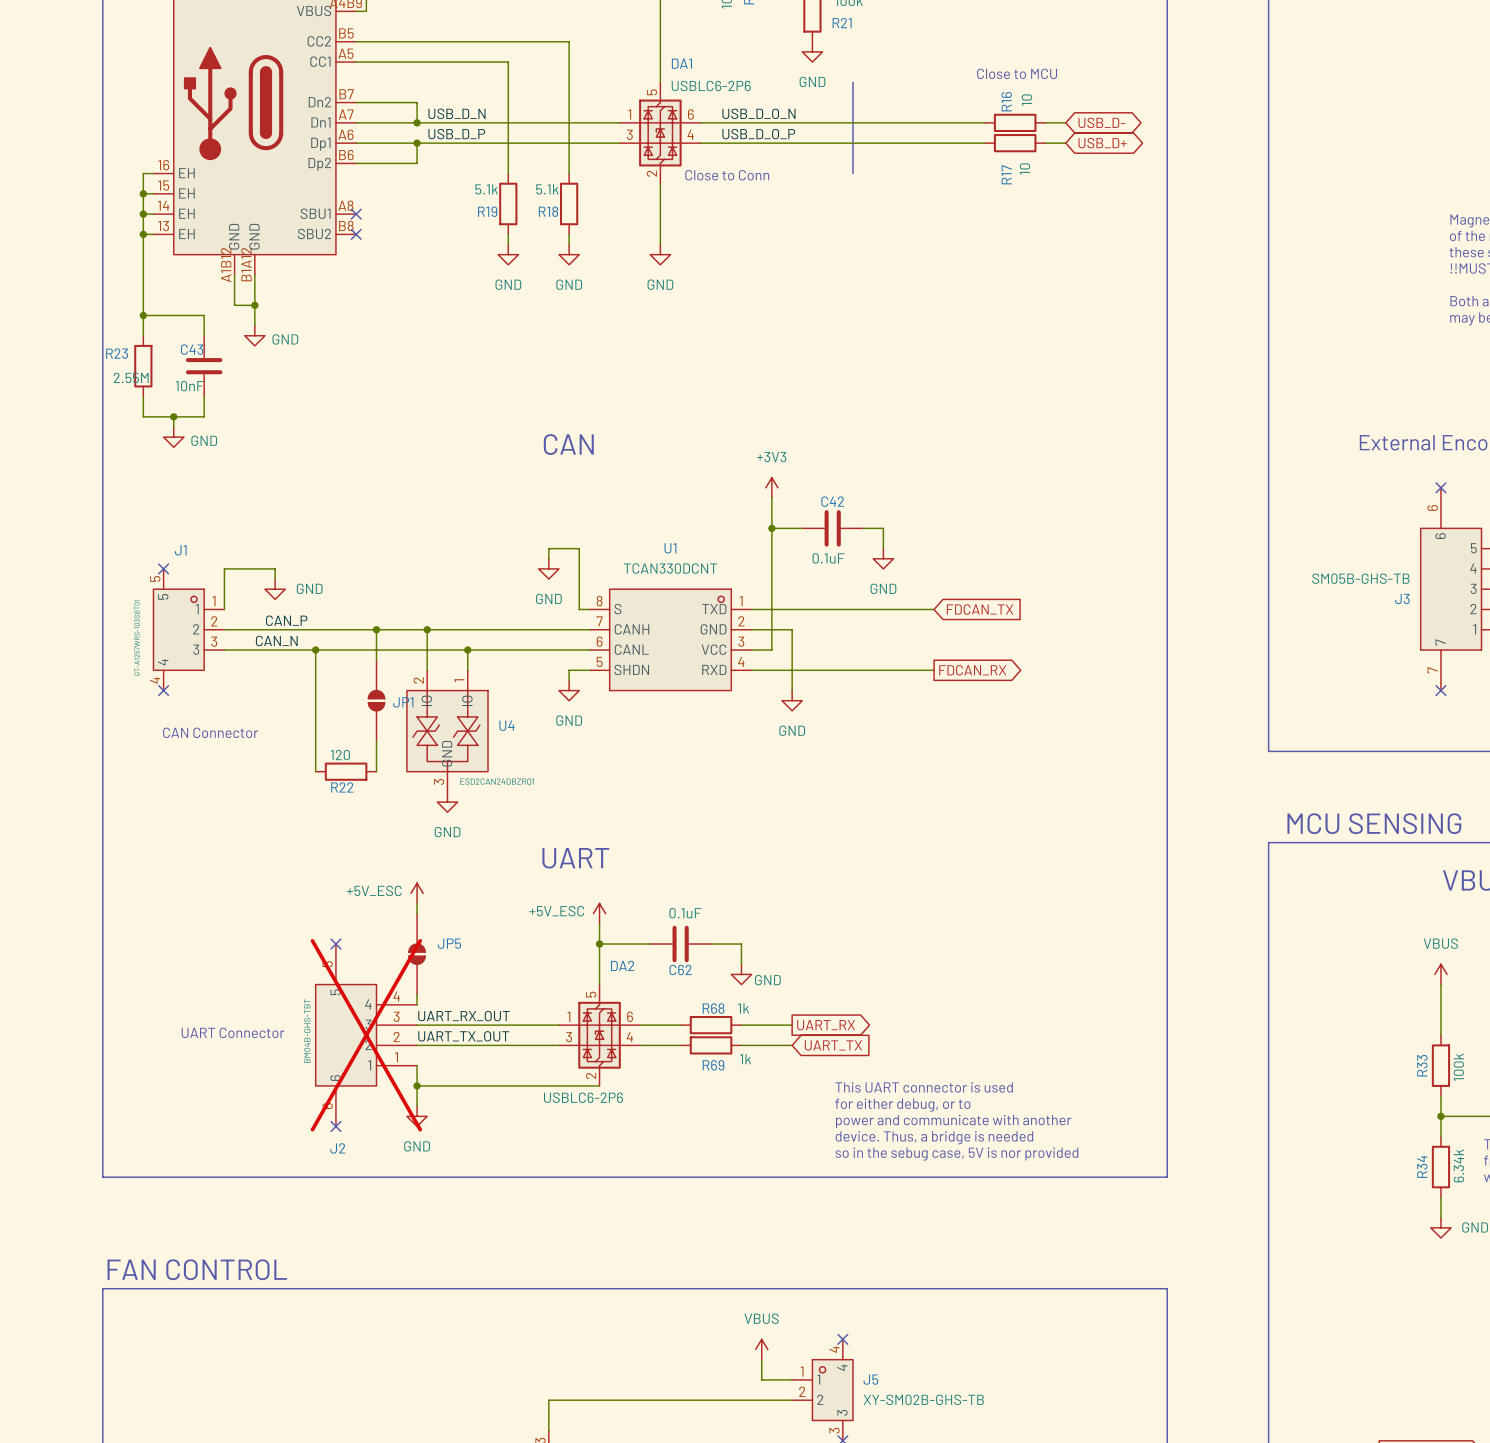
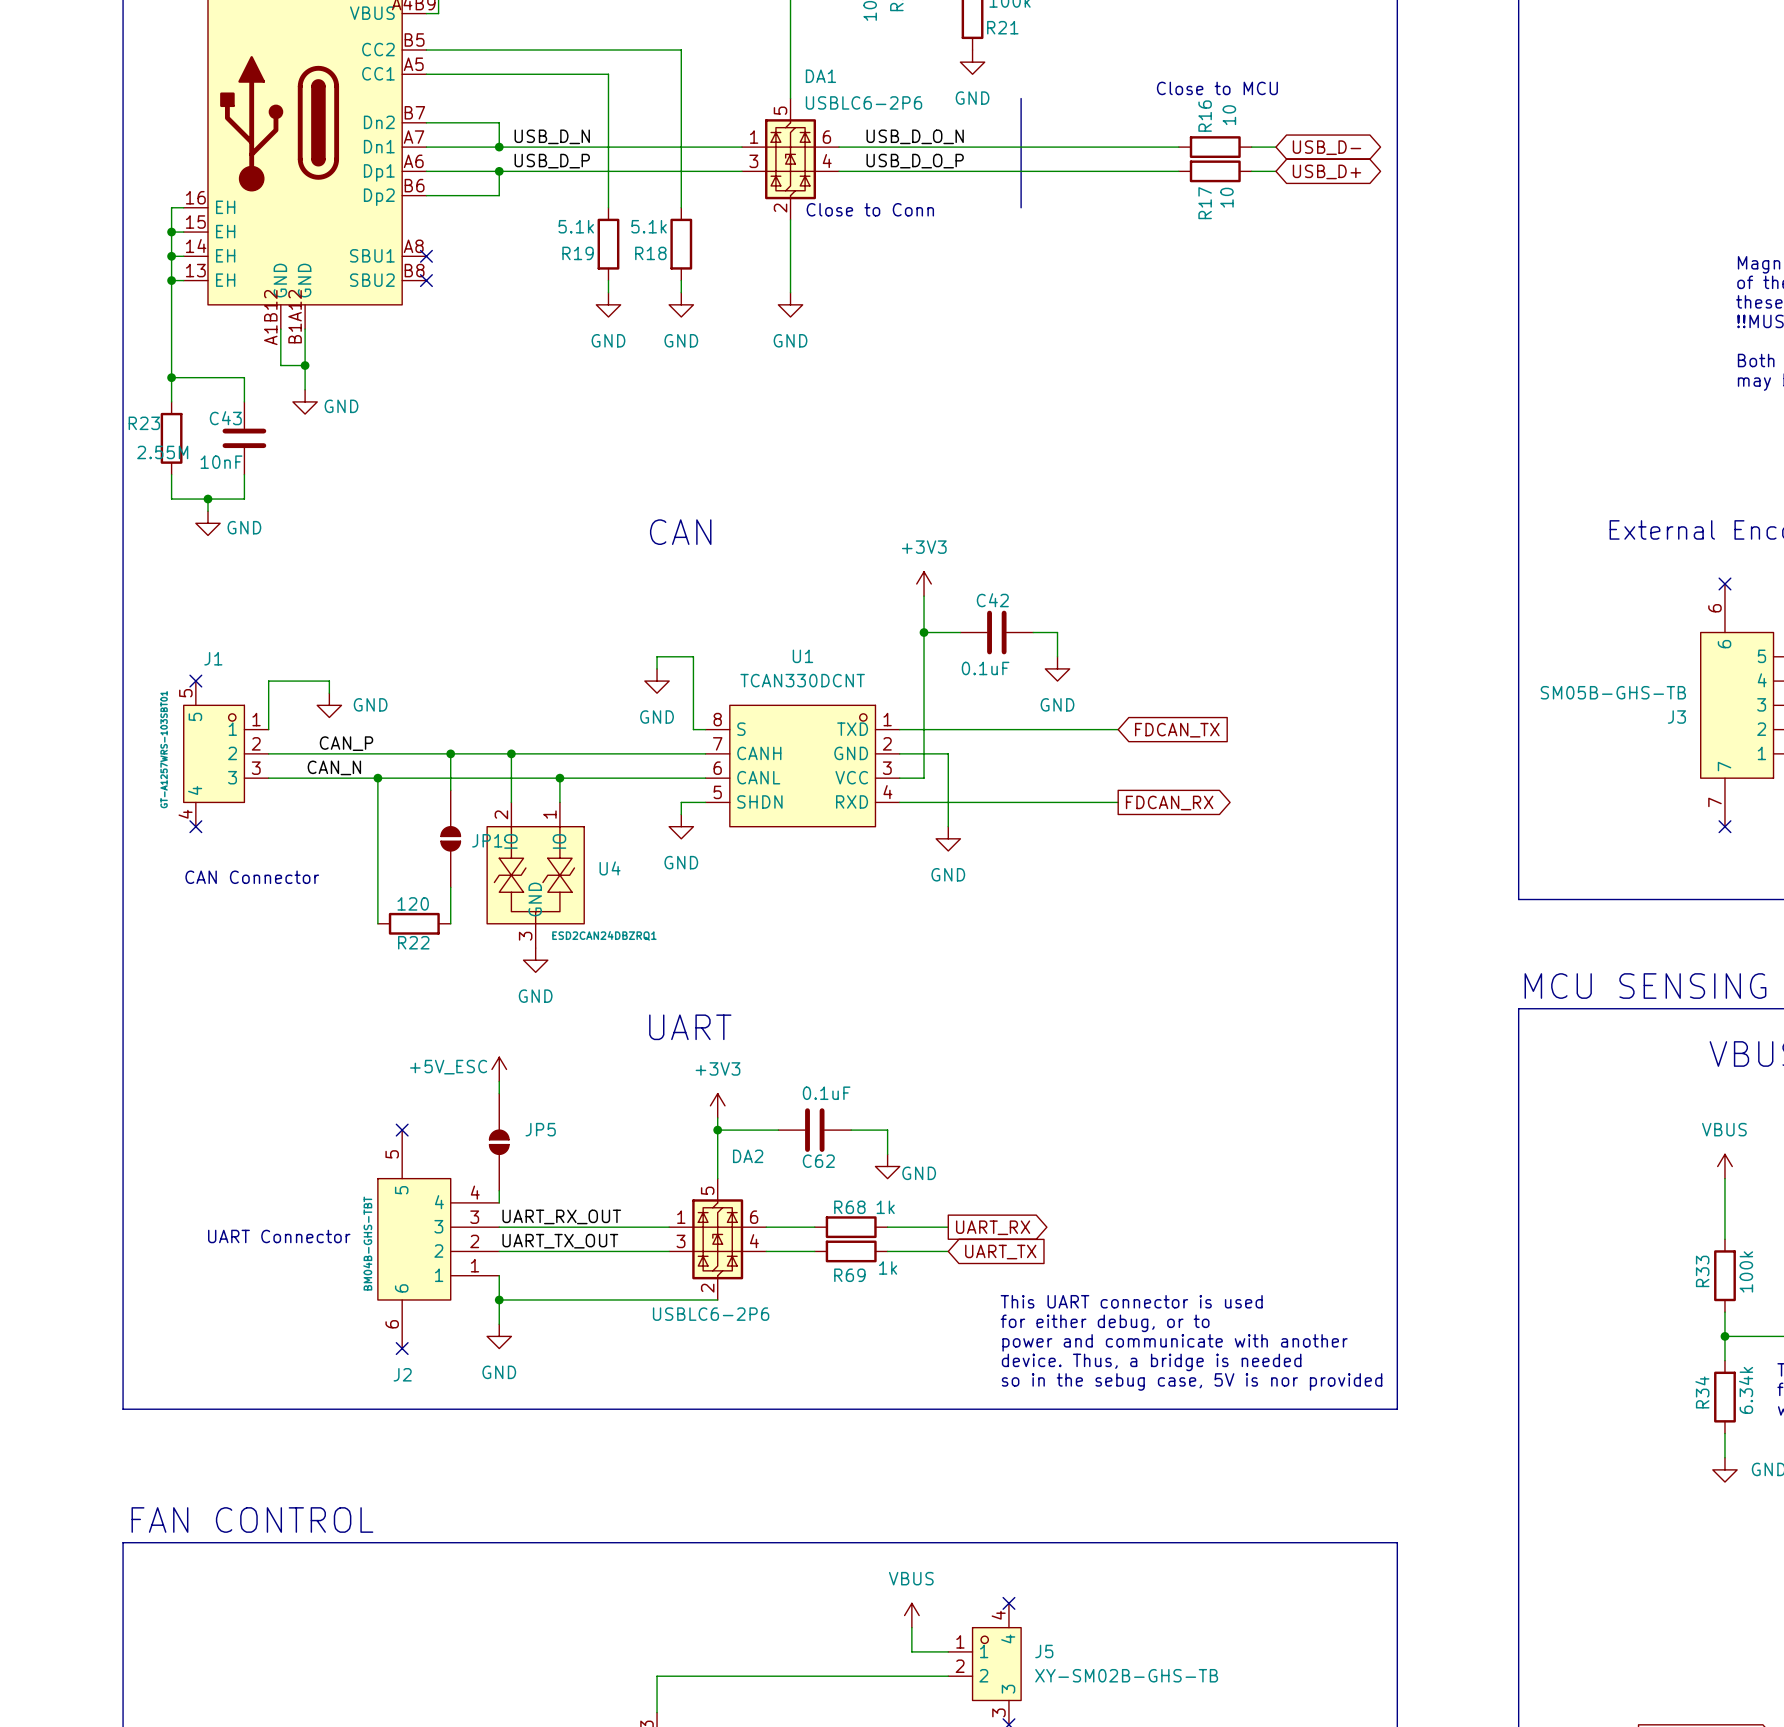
power symbol: +5V_ESC (599, 913) -> none
power symbol: none -> +3V3 (717, 1105)
J2 do-not-place cross: (366, 1035) -> none

